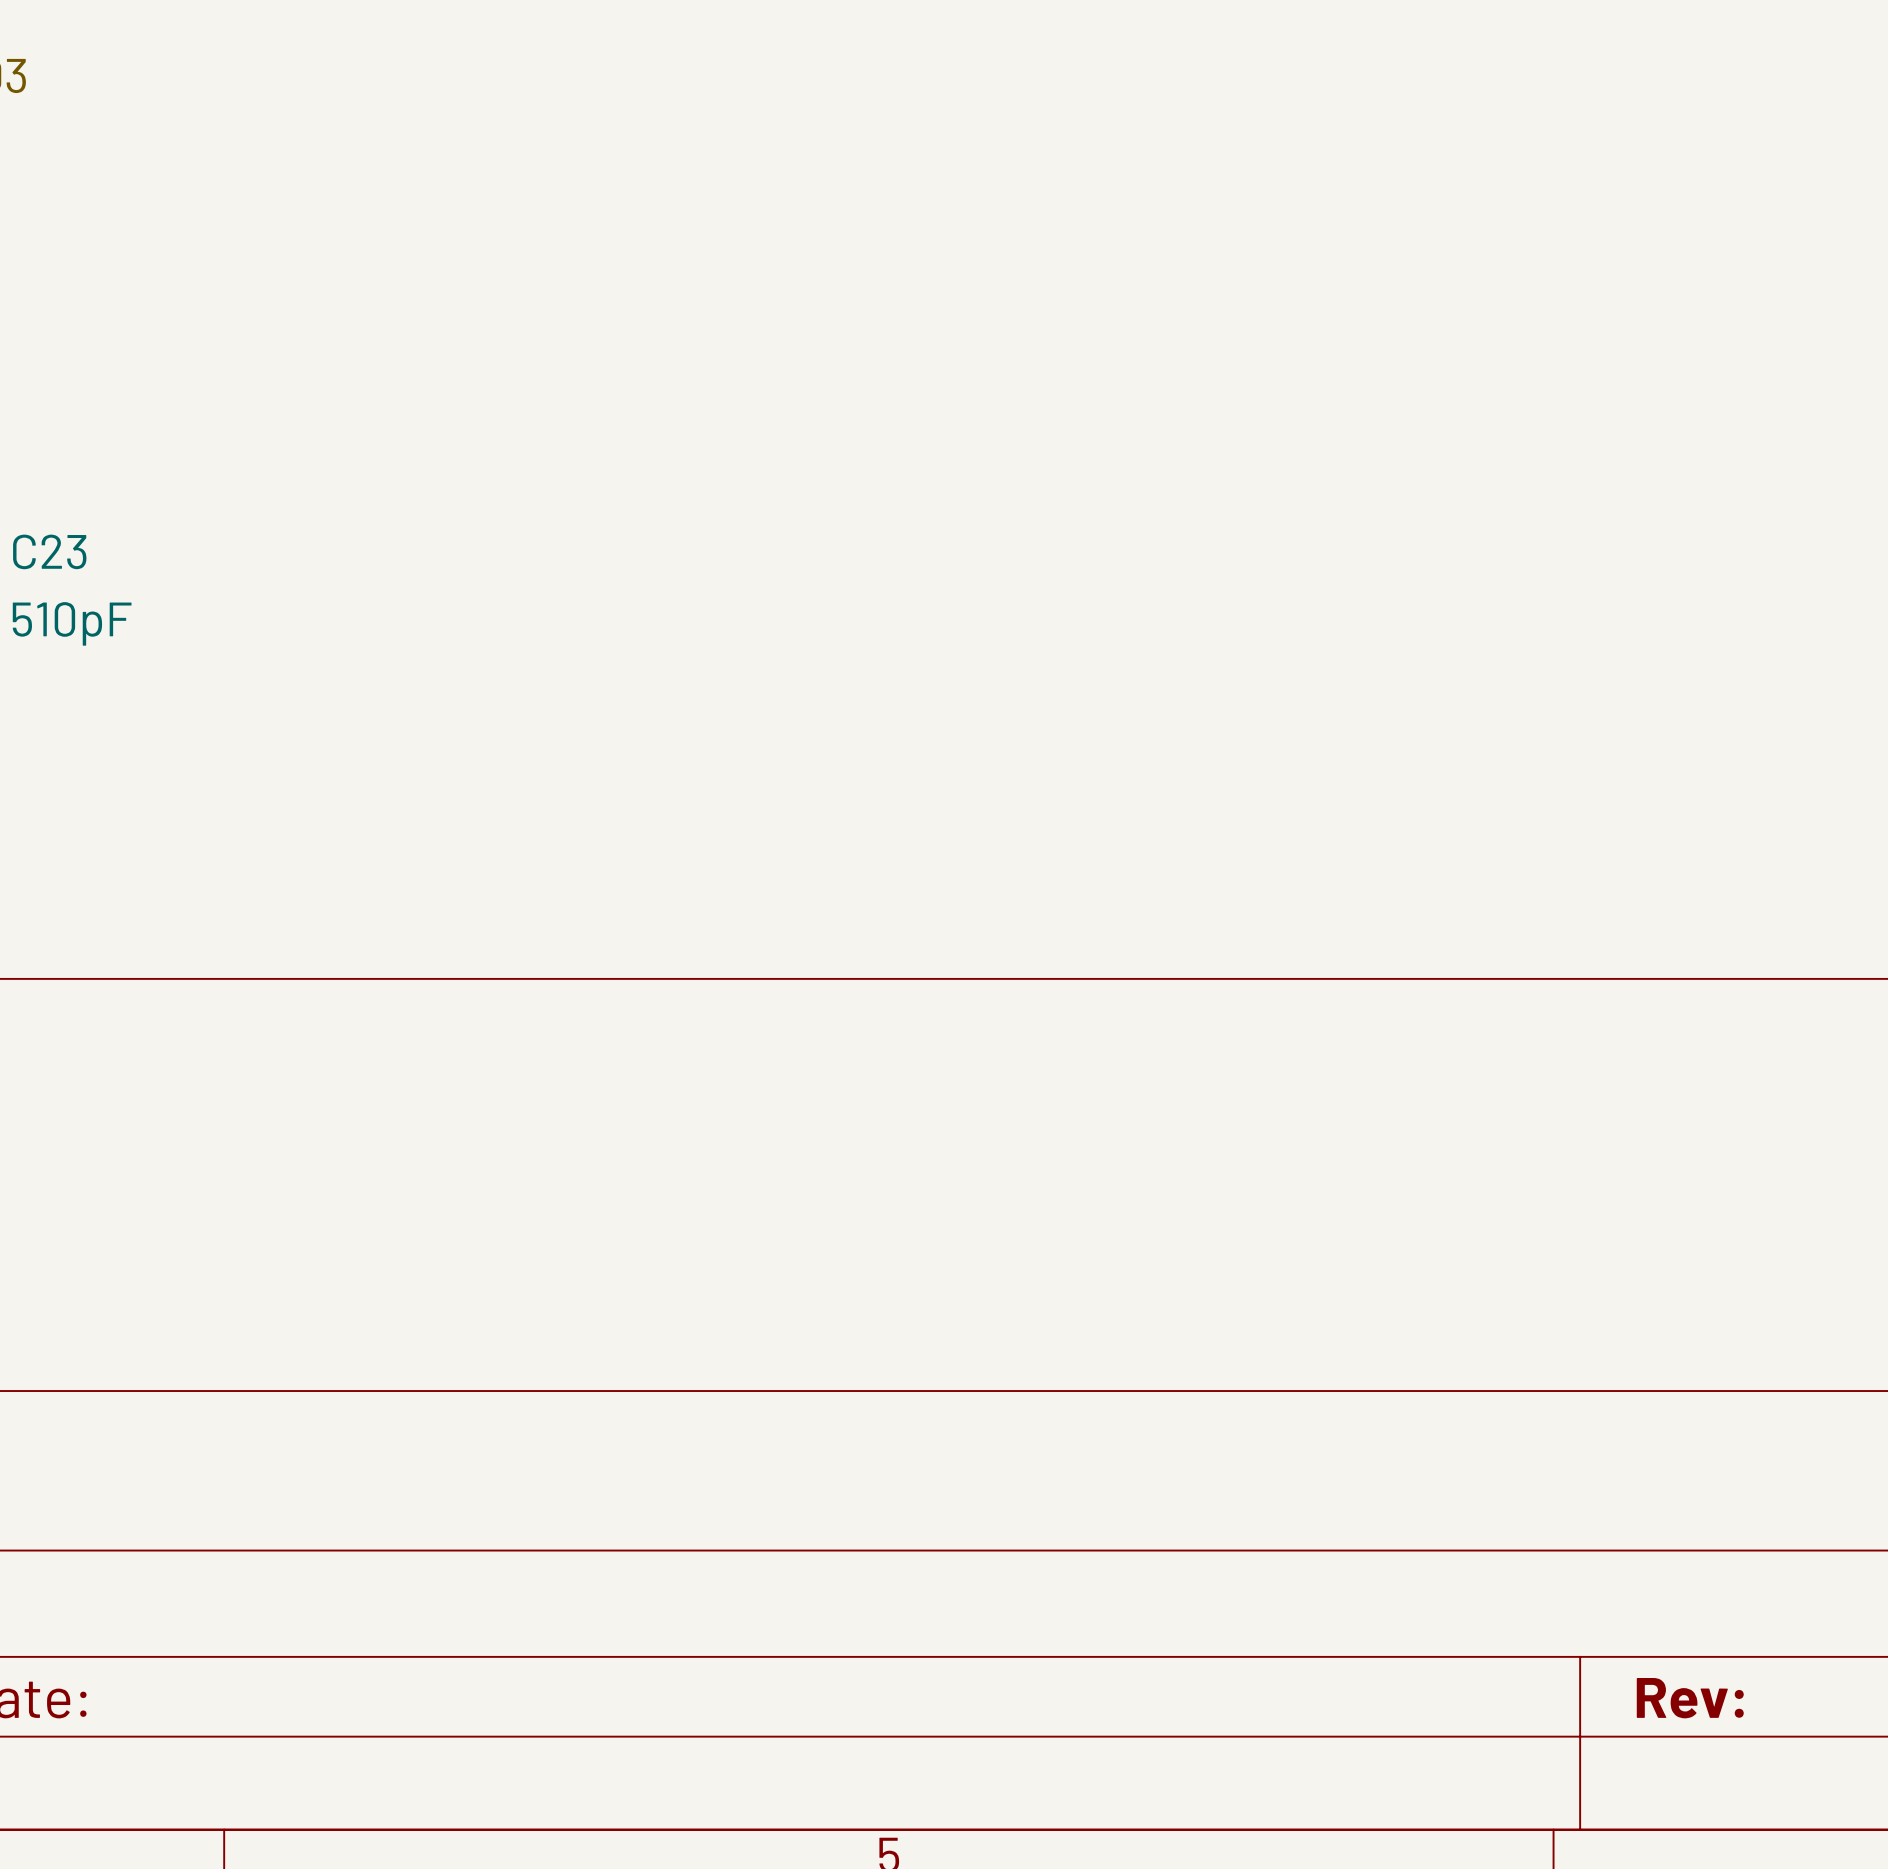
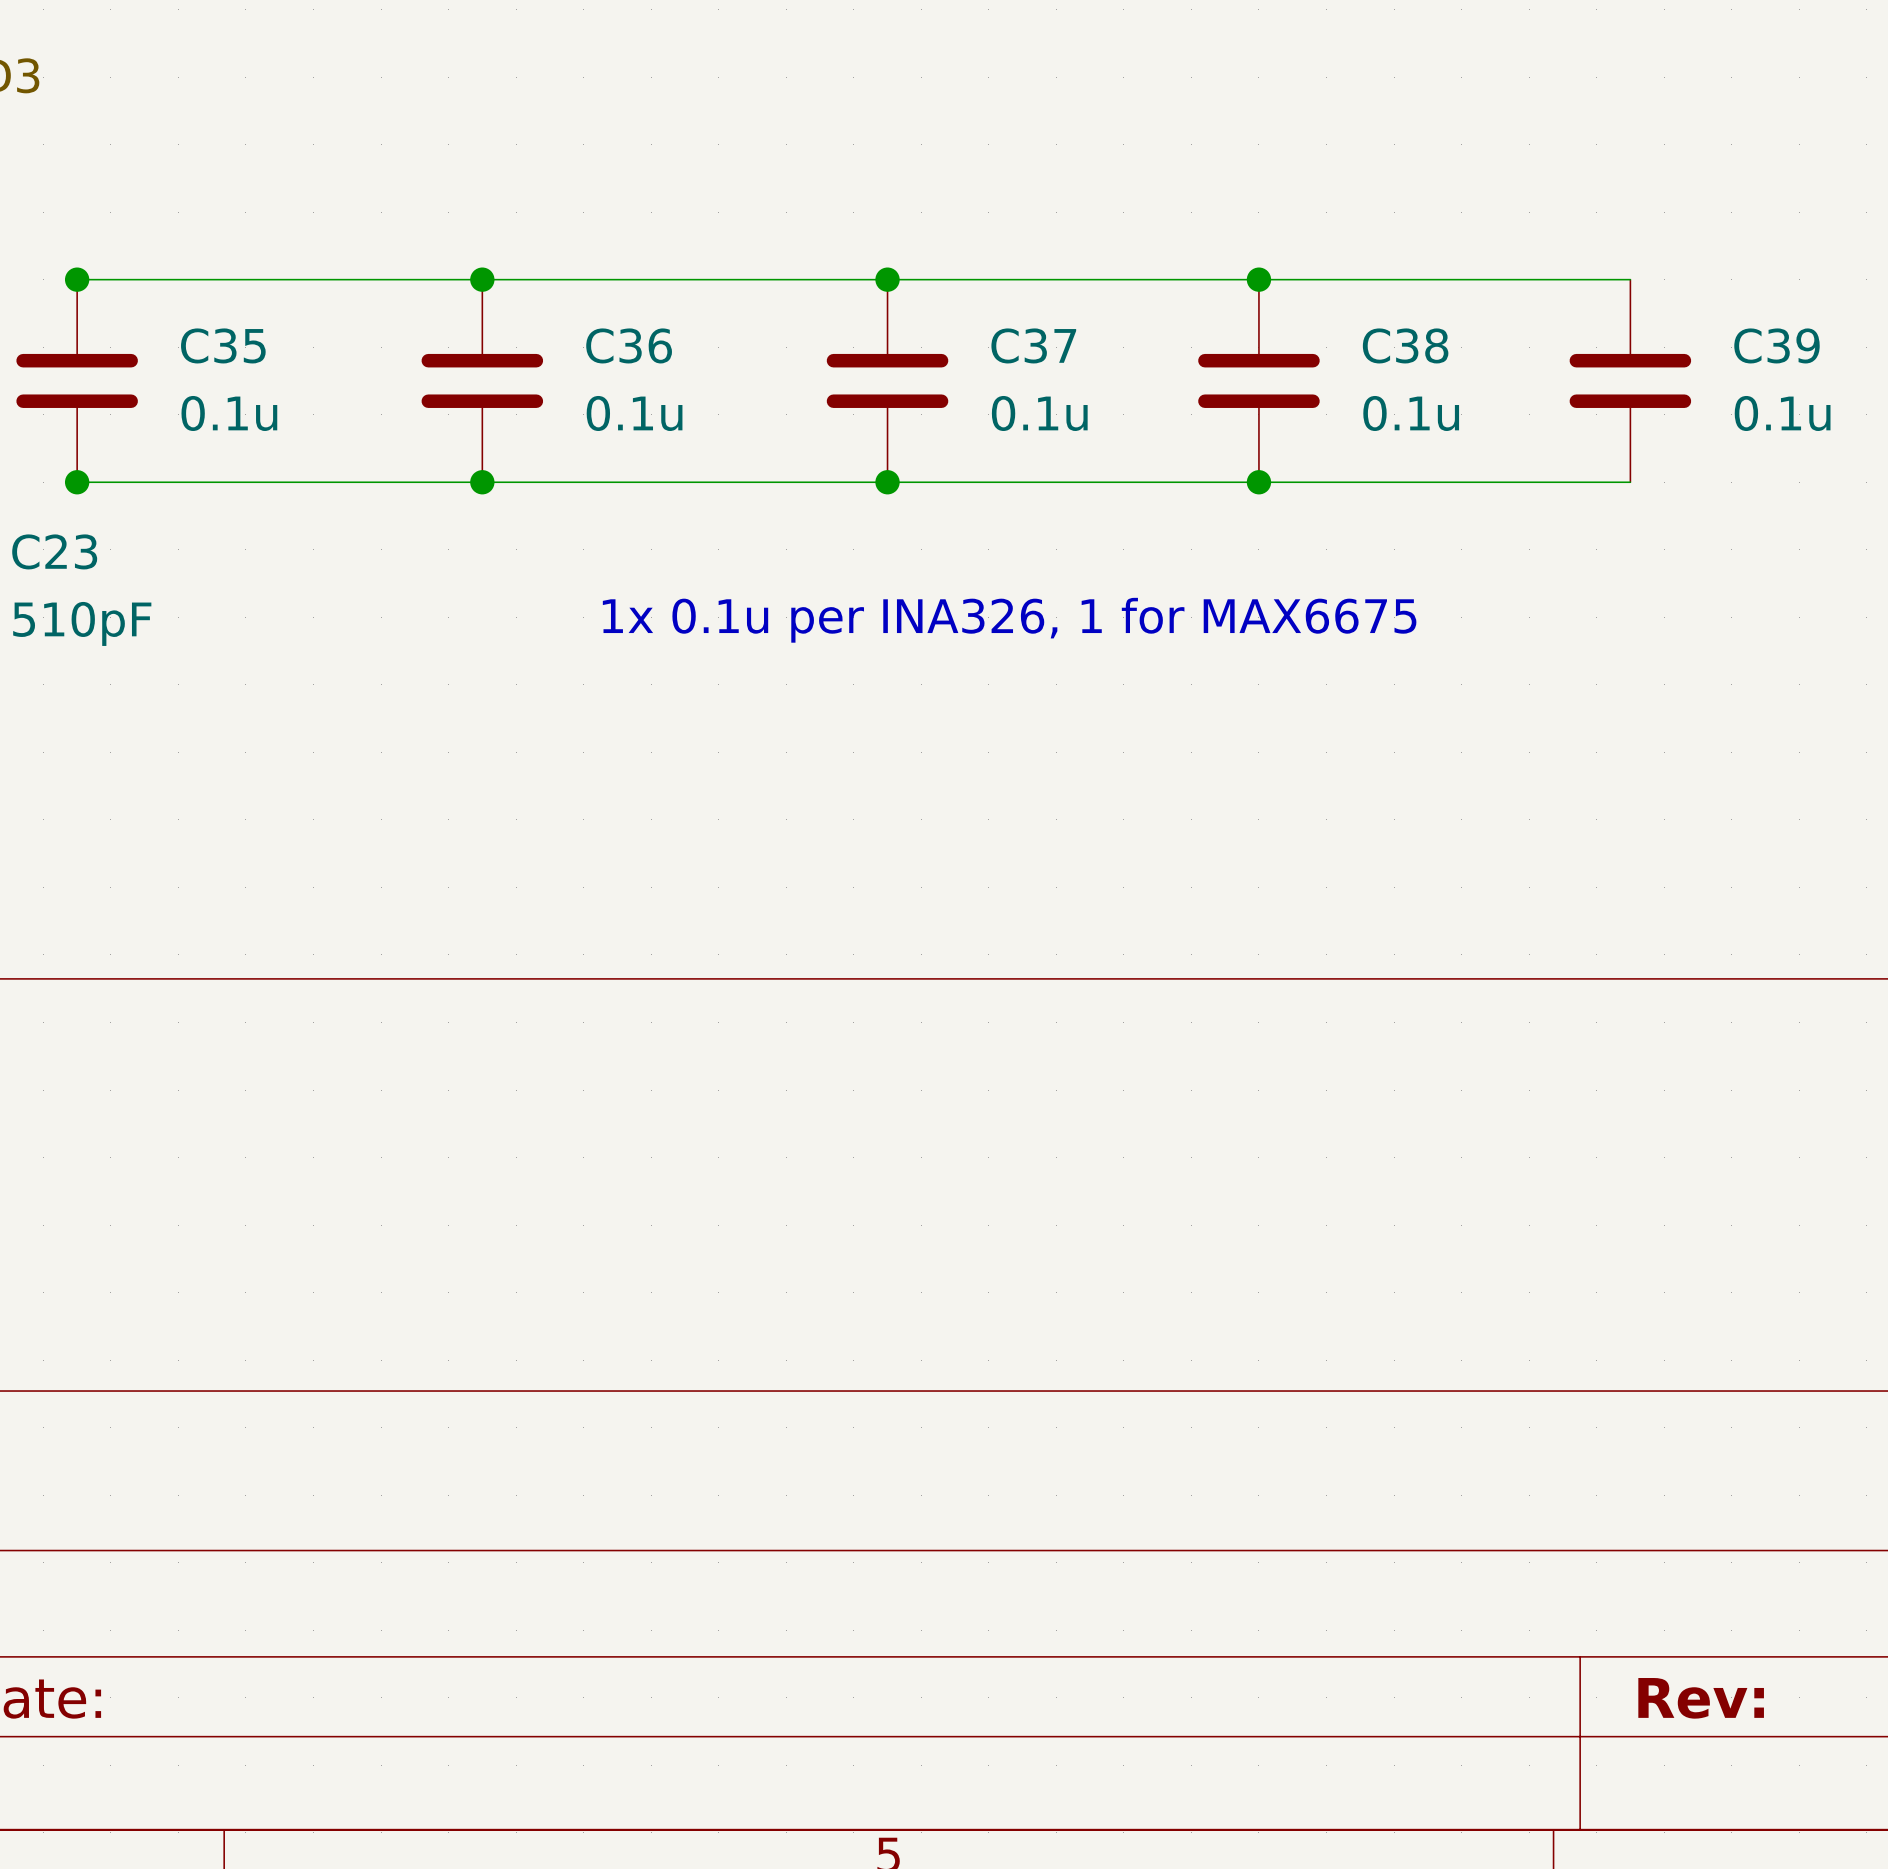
wire: none -> (77, 279) (1630, 279)
junction: none -> (77, 279)
junction: none -> (482, 279)
junction: none -> (887, 279)
junction: none -> (1258, 279)
C35: none -> 0.1u (77, 380)
C36: none -> 0.1u (482, 380)
C37: none -> 0.1u (887, 380)
C38: none -> 0.1u (1258, 380)
C39: none -> 0.1u (1630, 380)
wire: none -> (77, 482) (1630, 482)
junction: none -> (77, 482)
junction: none -> (482, 482)
junction: none -> (887, 482)
junction: none -> (1258, 482)
text: none -> 1x 0.1u per INA326, 1 for MAX6675 (1009, 620)

